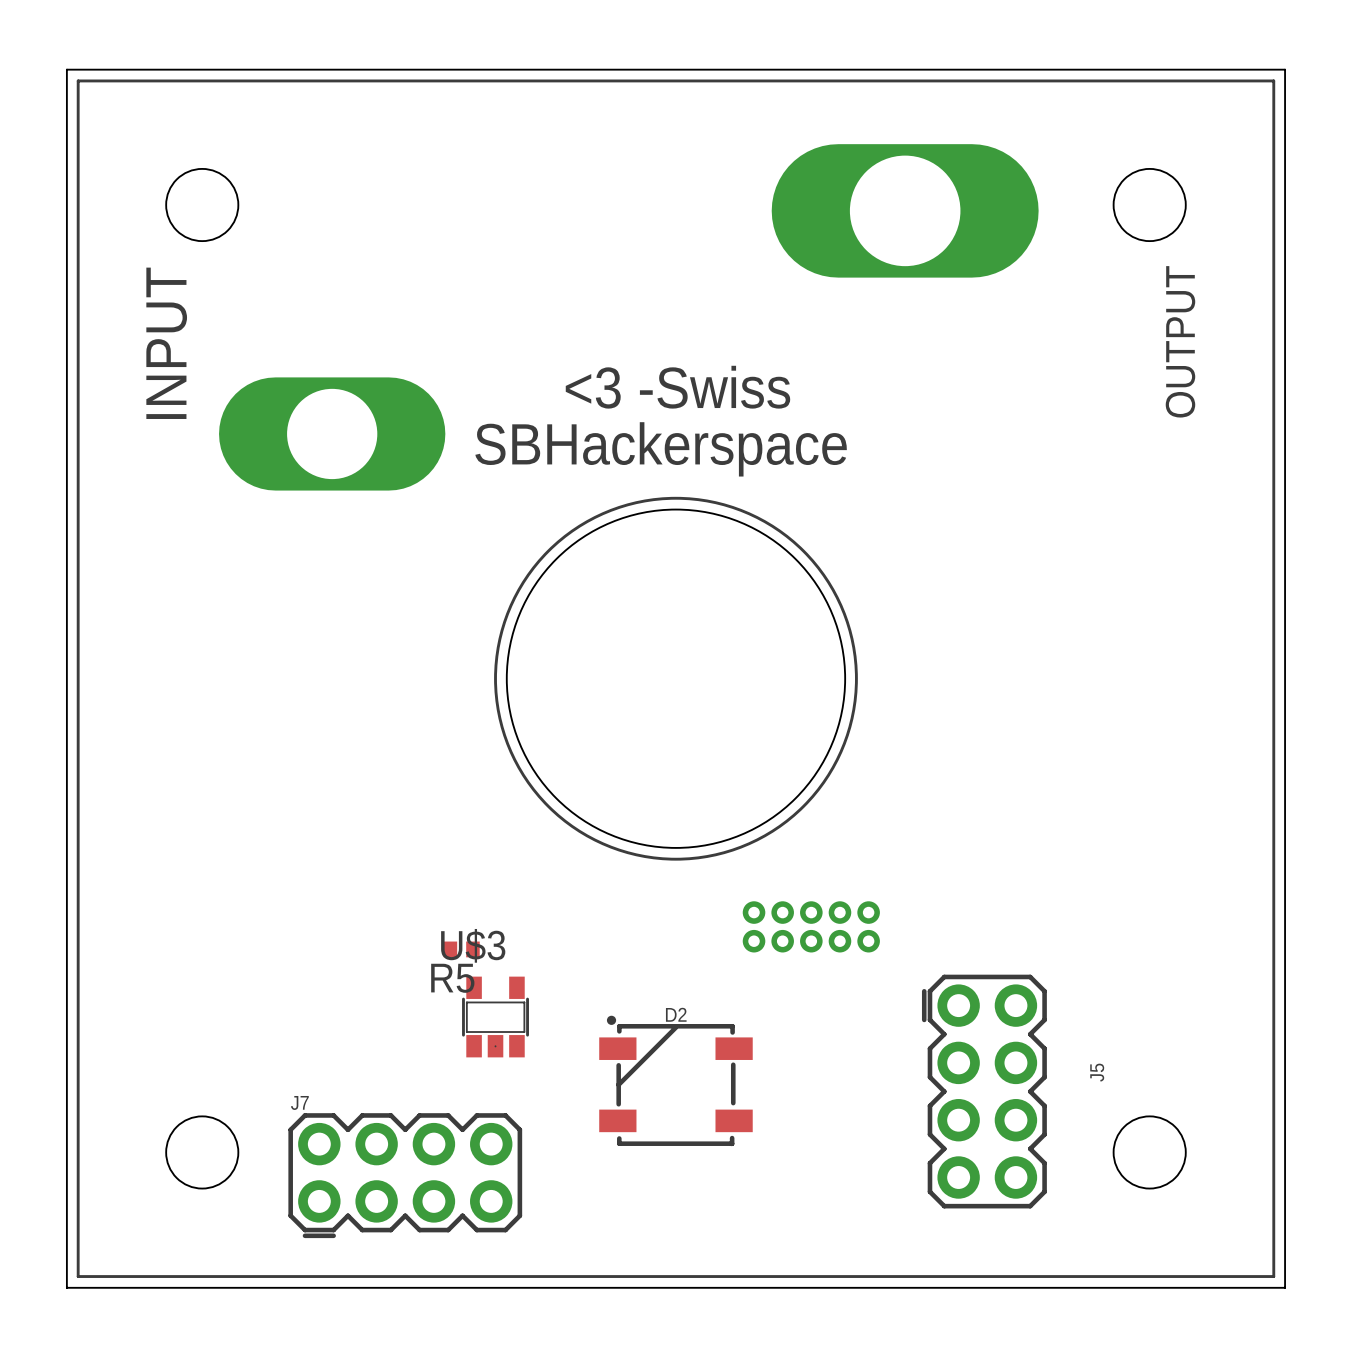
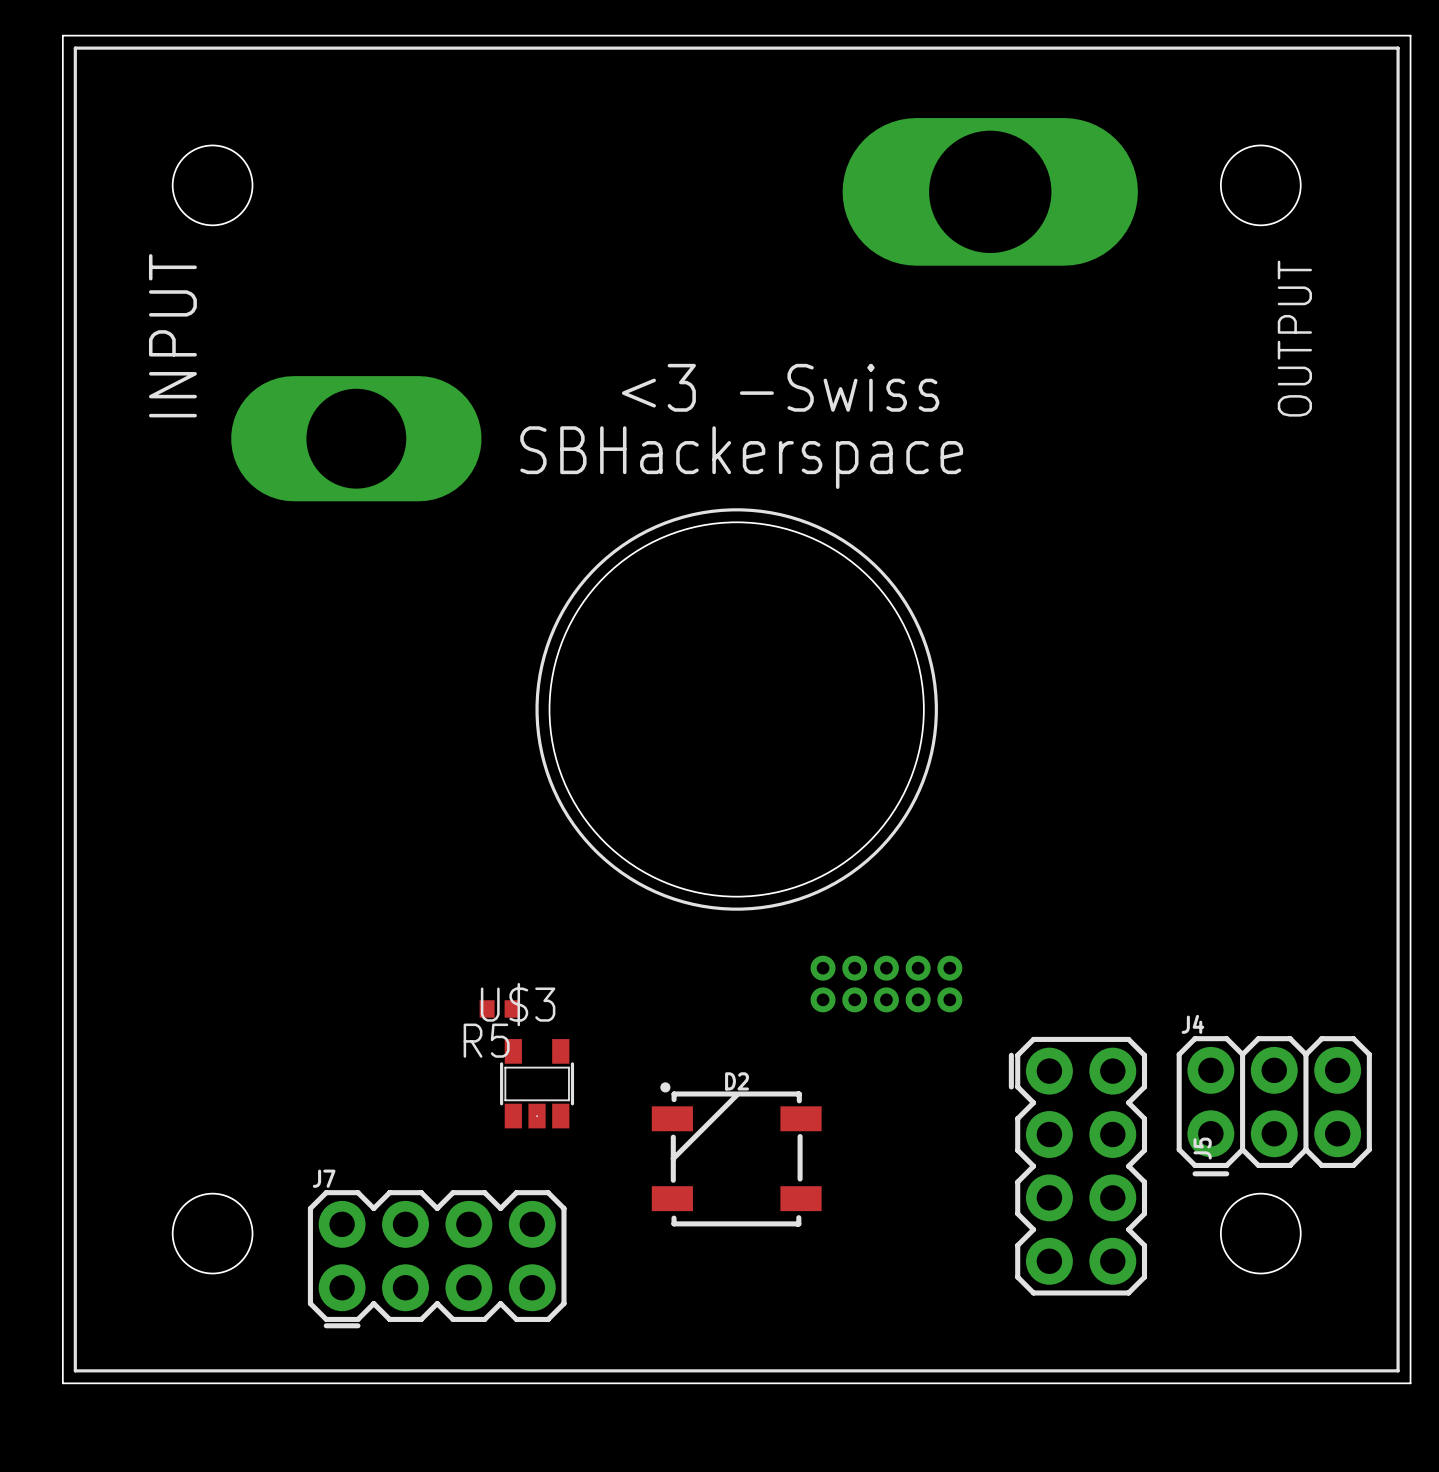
J4: none -> (1274, 1106)

